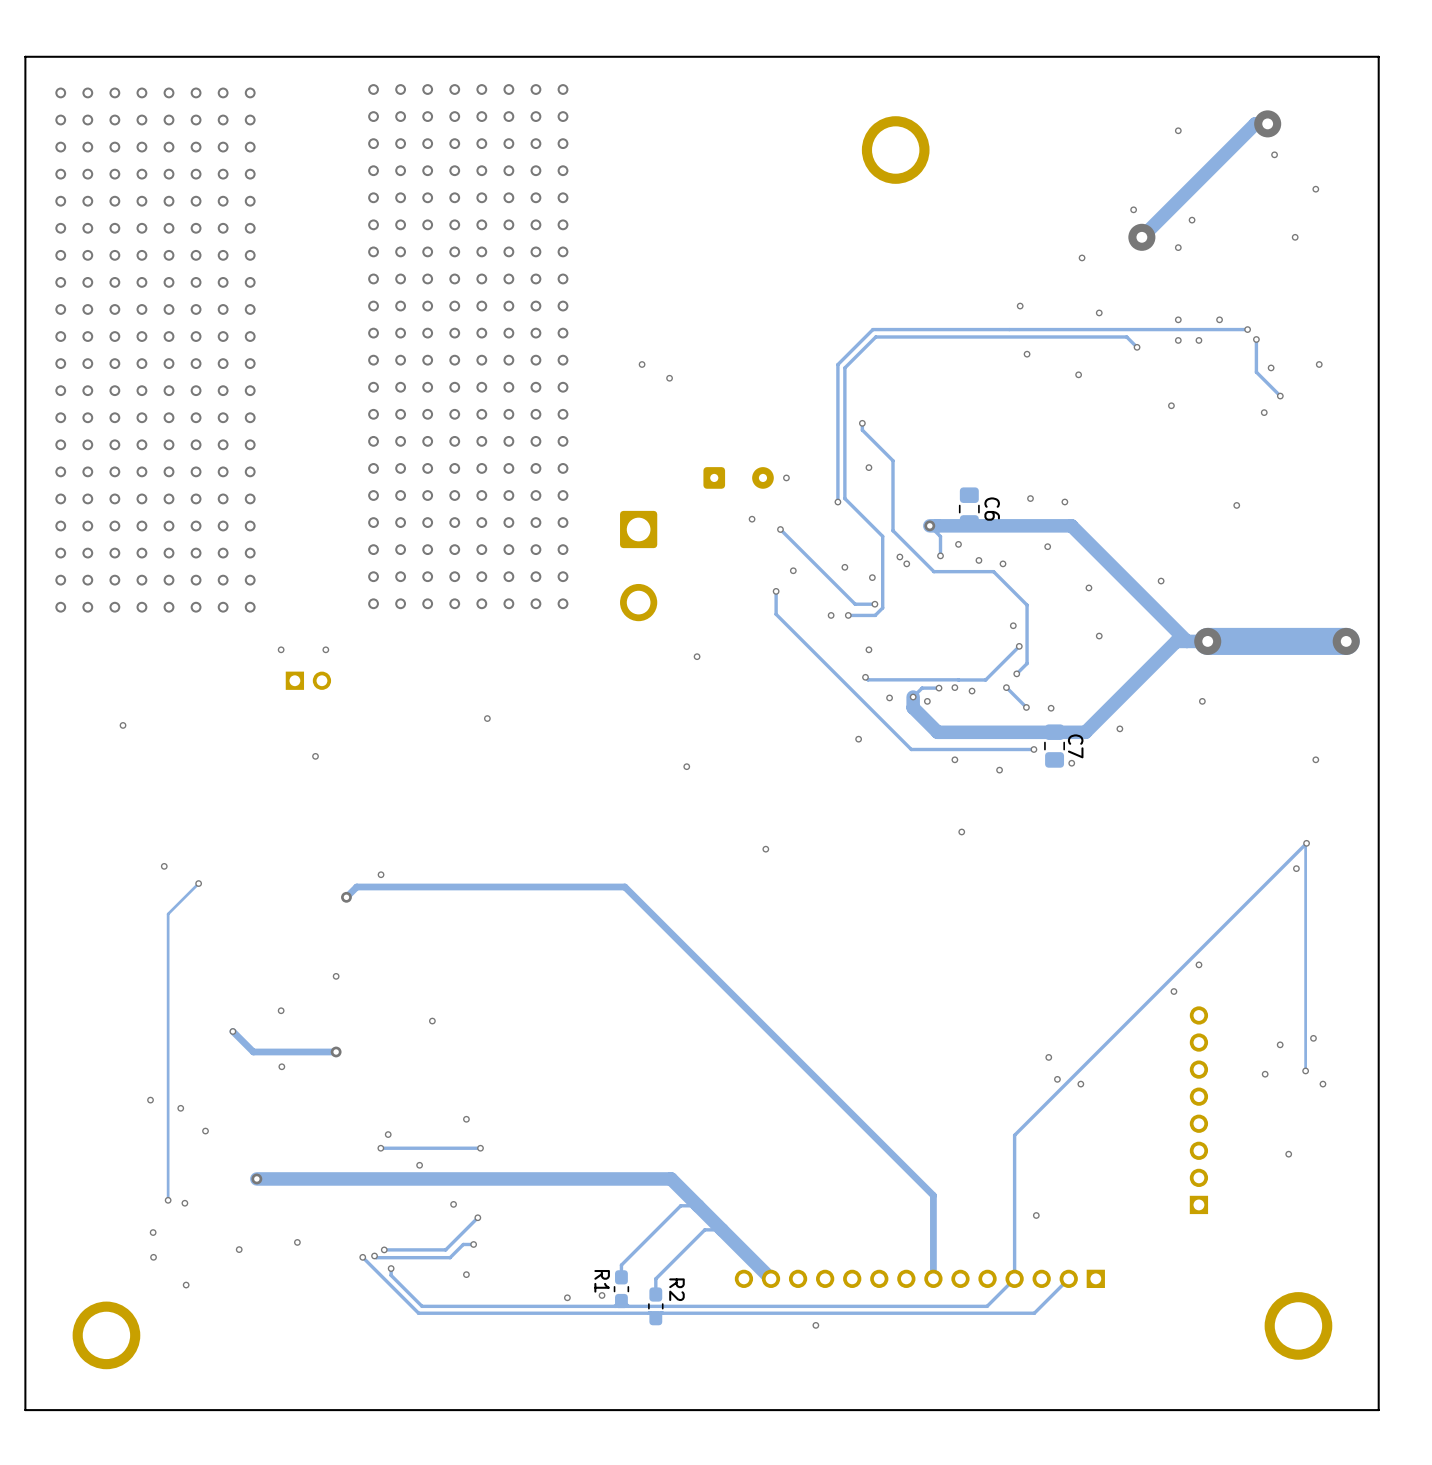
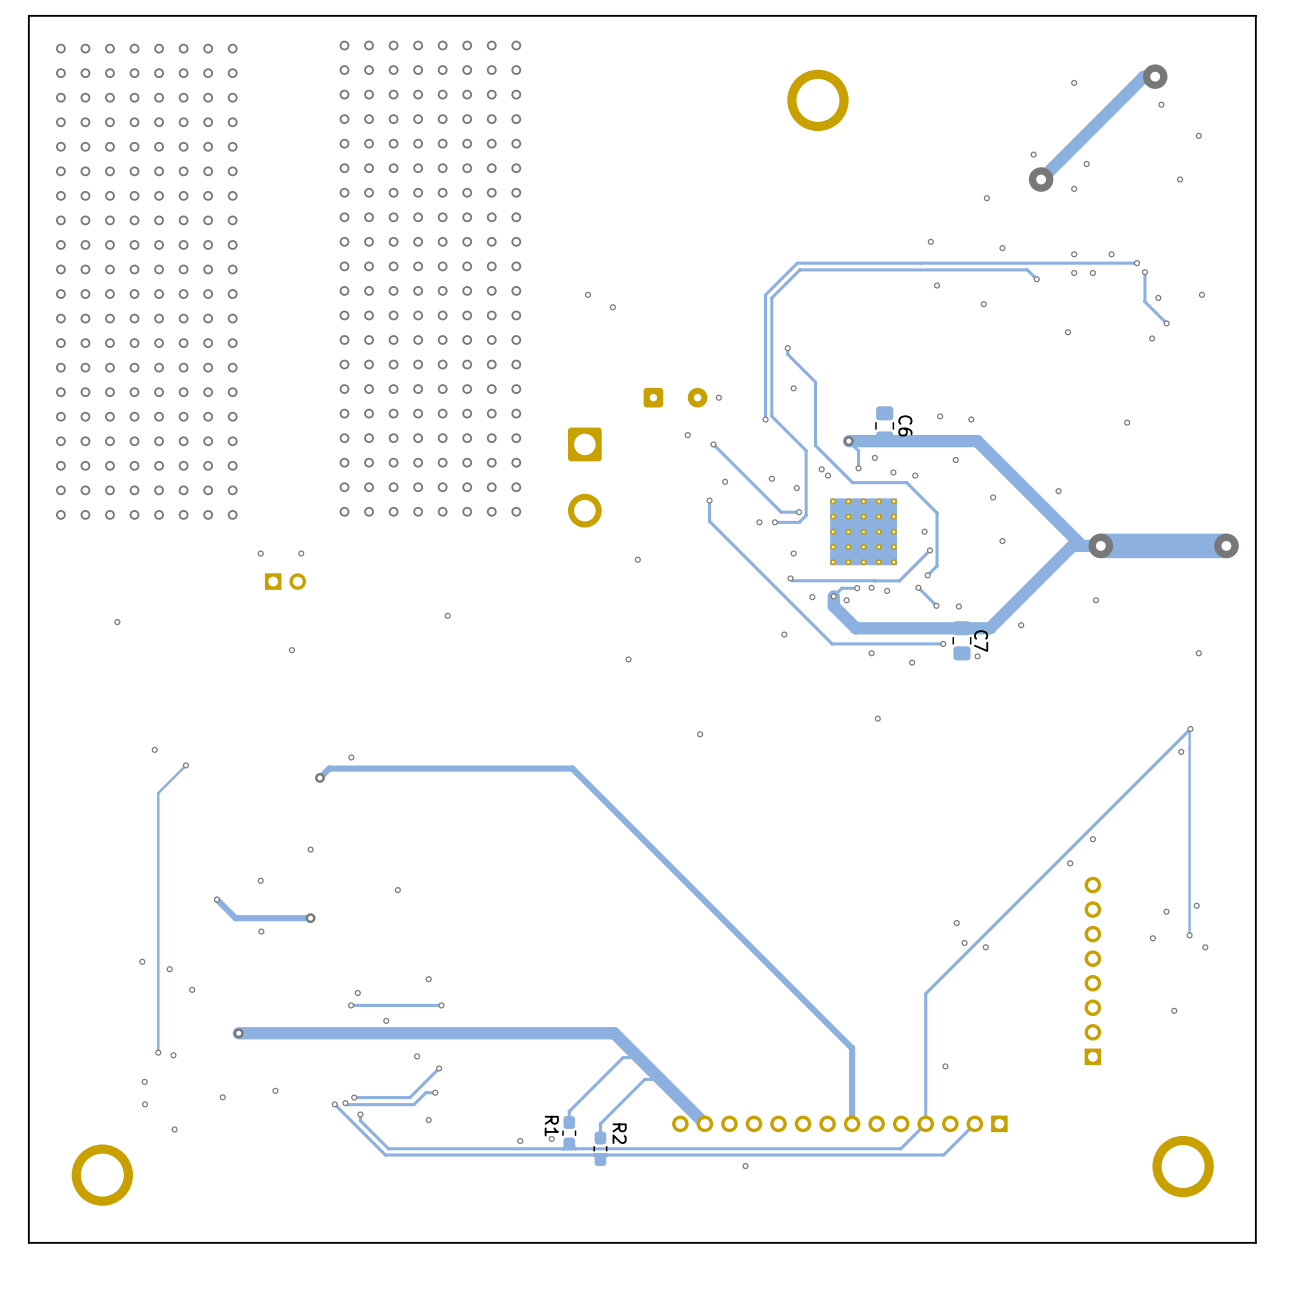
part: none -> (863, 531)

